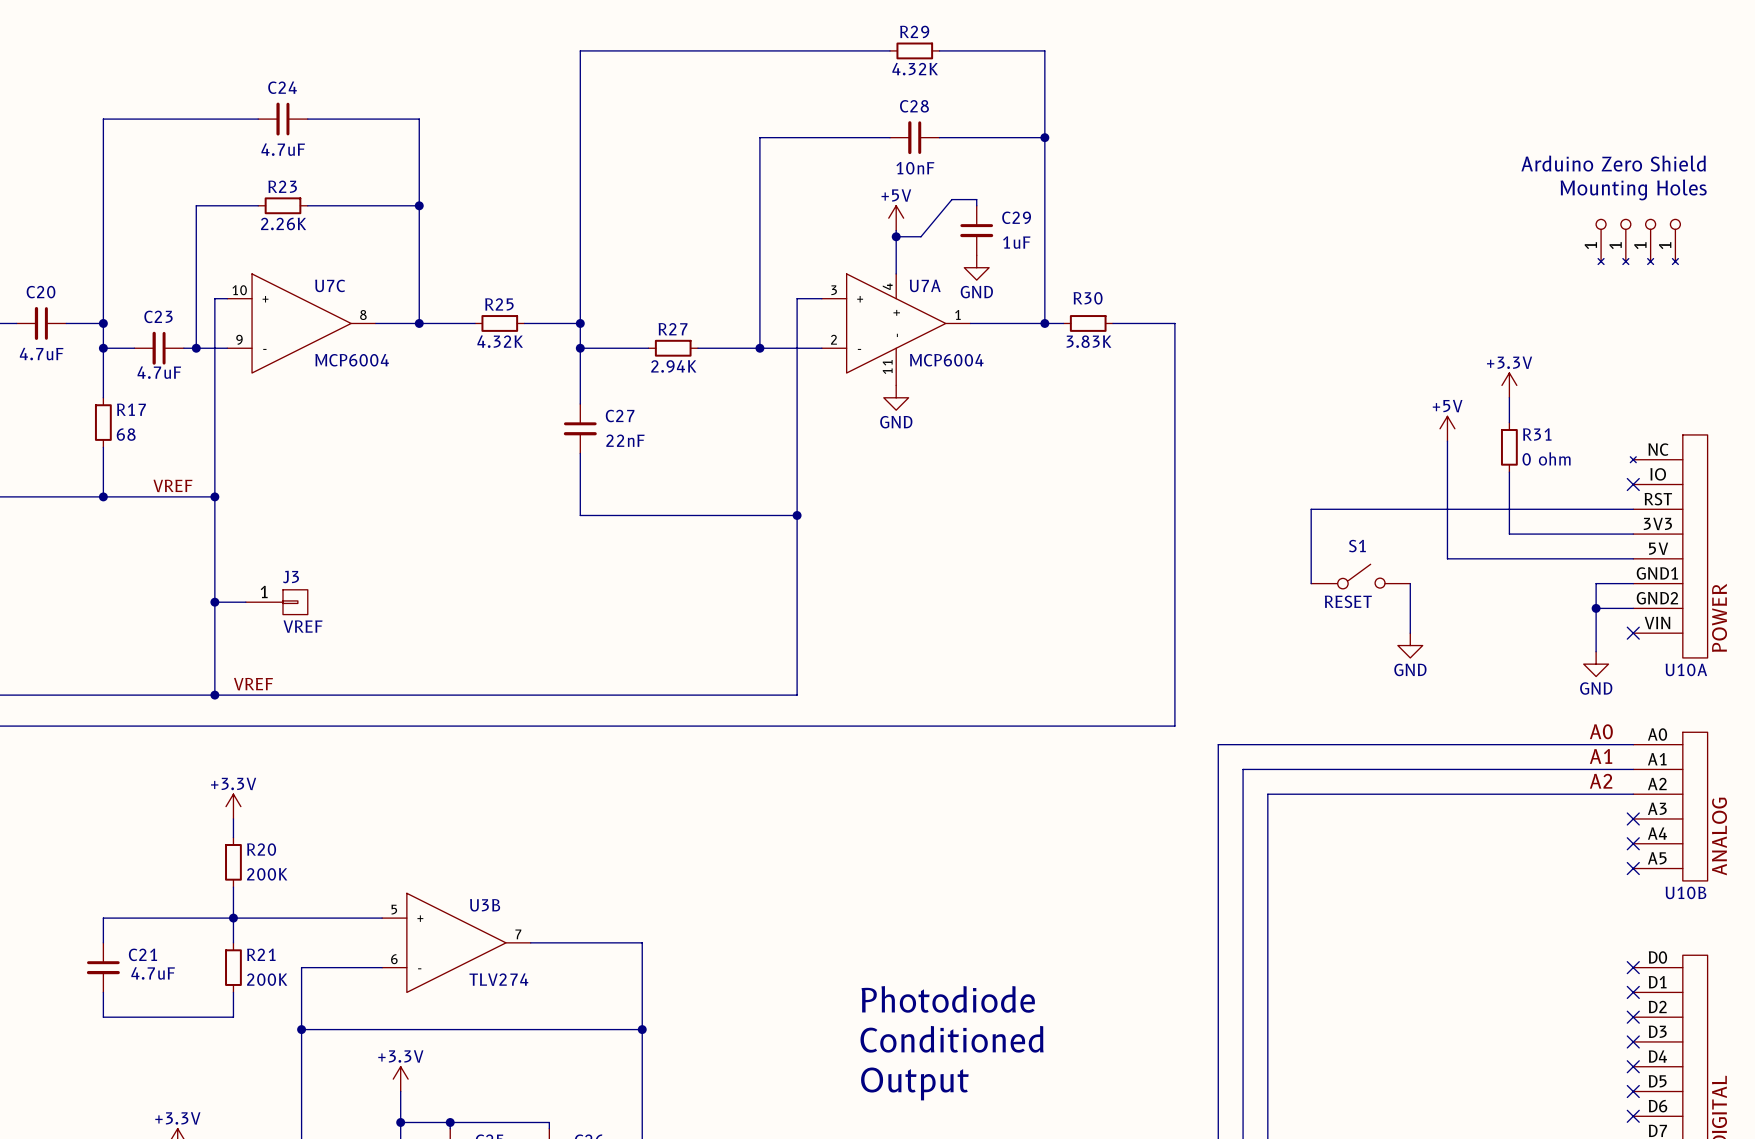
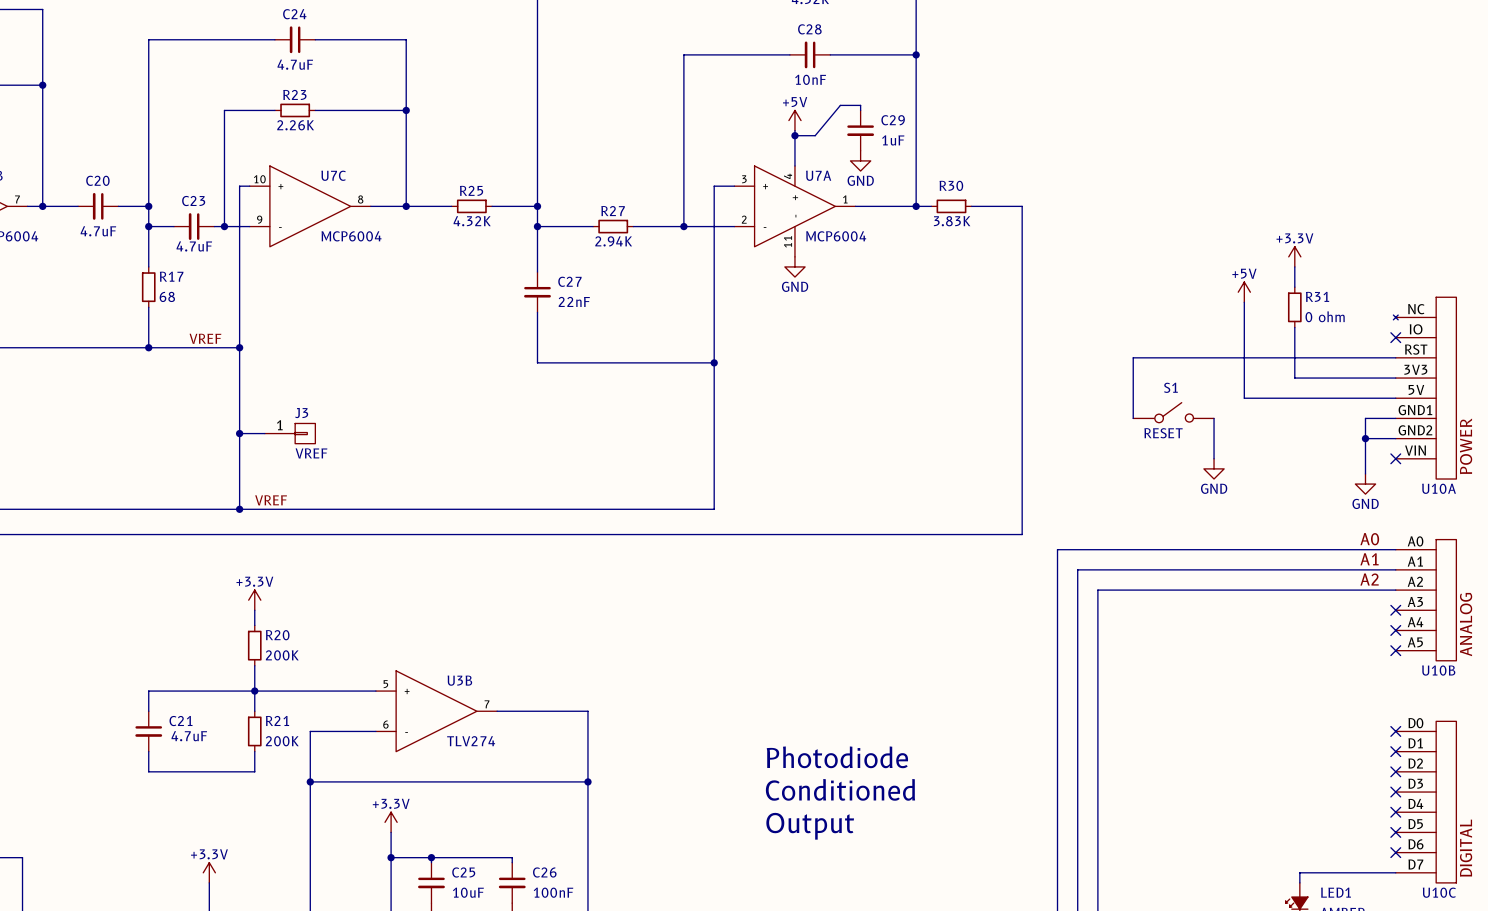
text: Arduino Zero Shield (1613, 163) -> none
text: Mounting Holes (1633, 189) -> none
part: (1601, 241) -> none
part: (1625, 241) -> none
part: (1650, 241) -> none
part: (1675, 241) -> none

